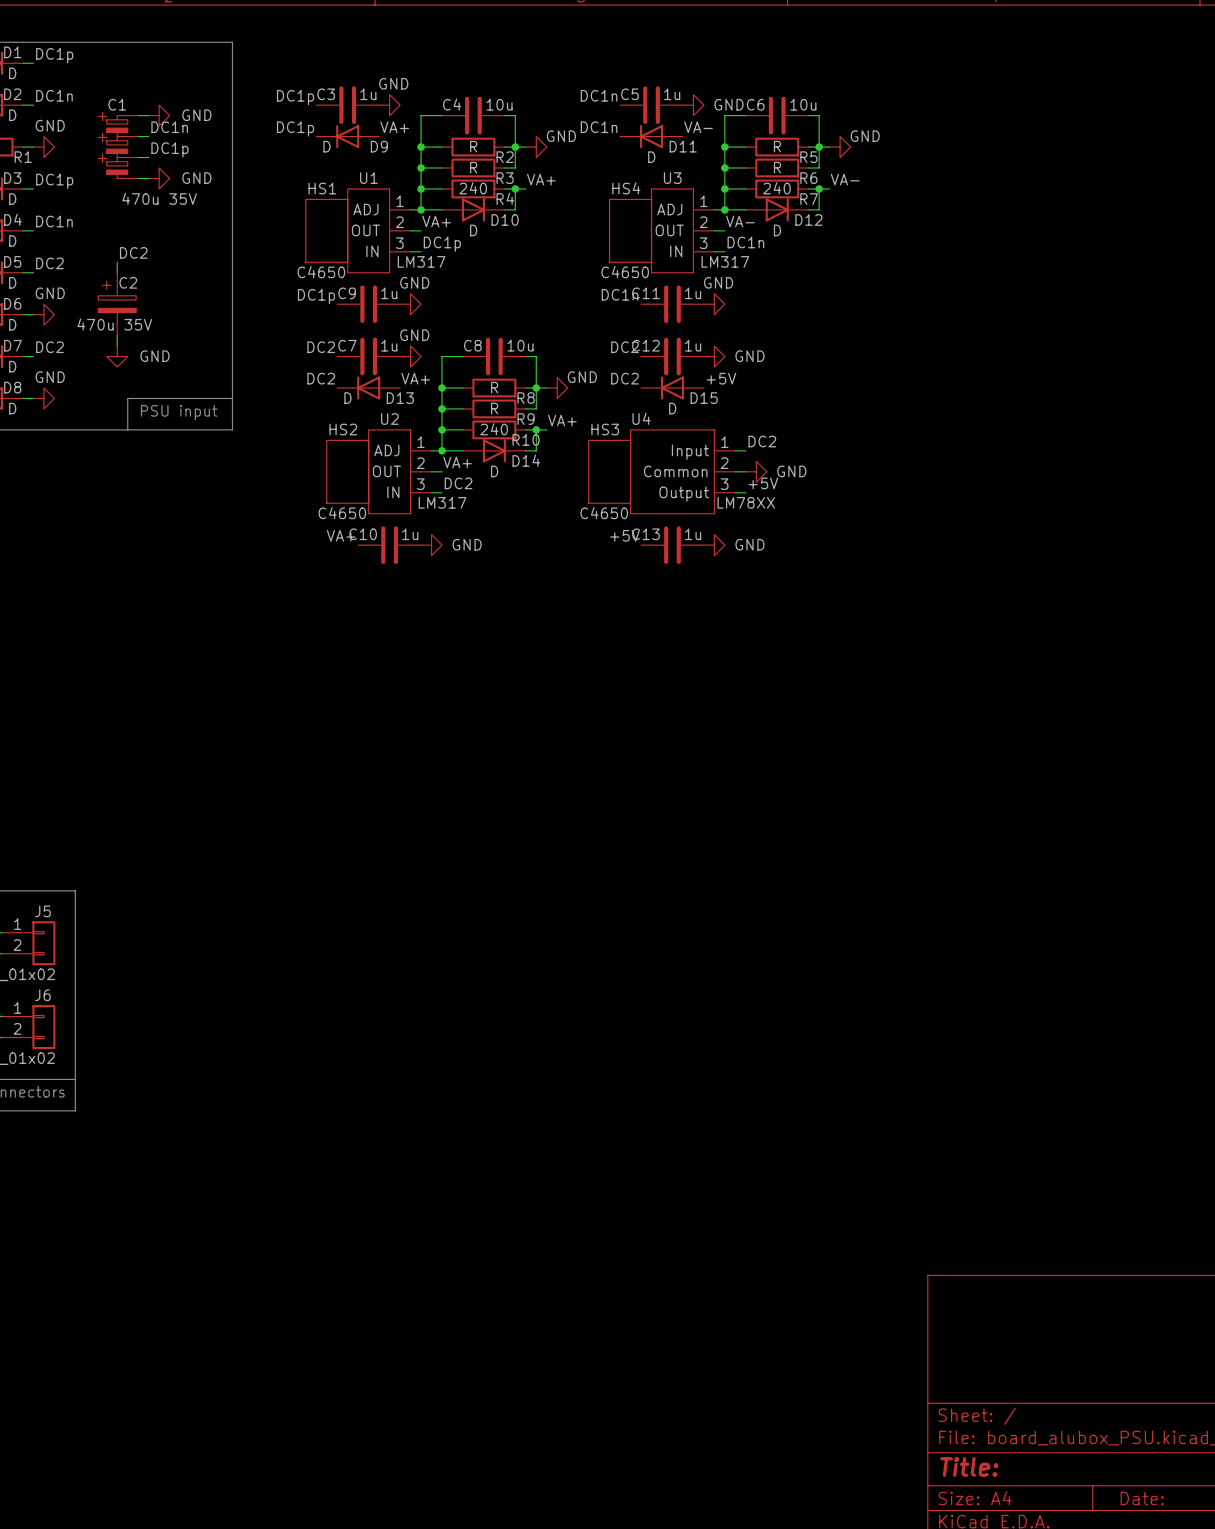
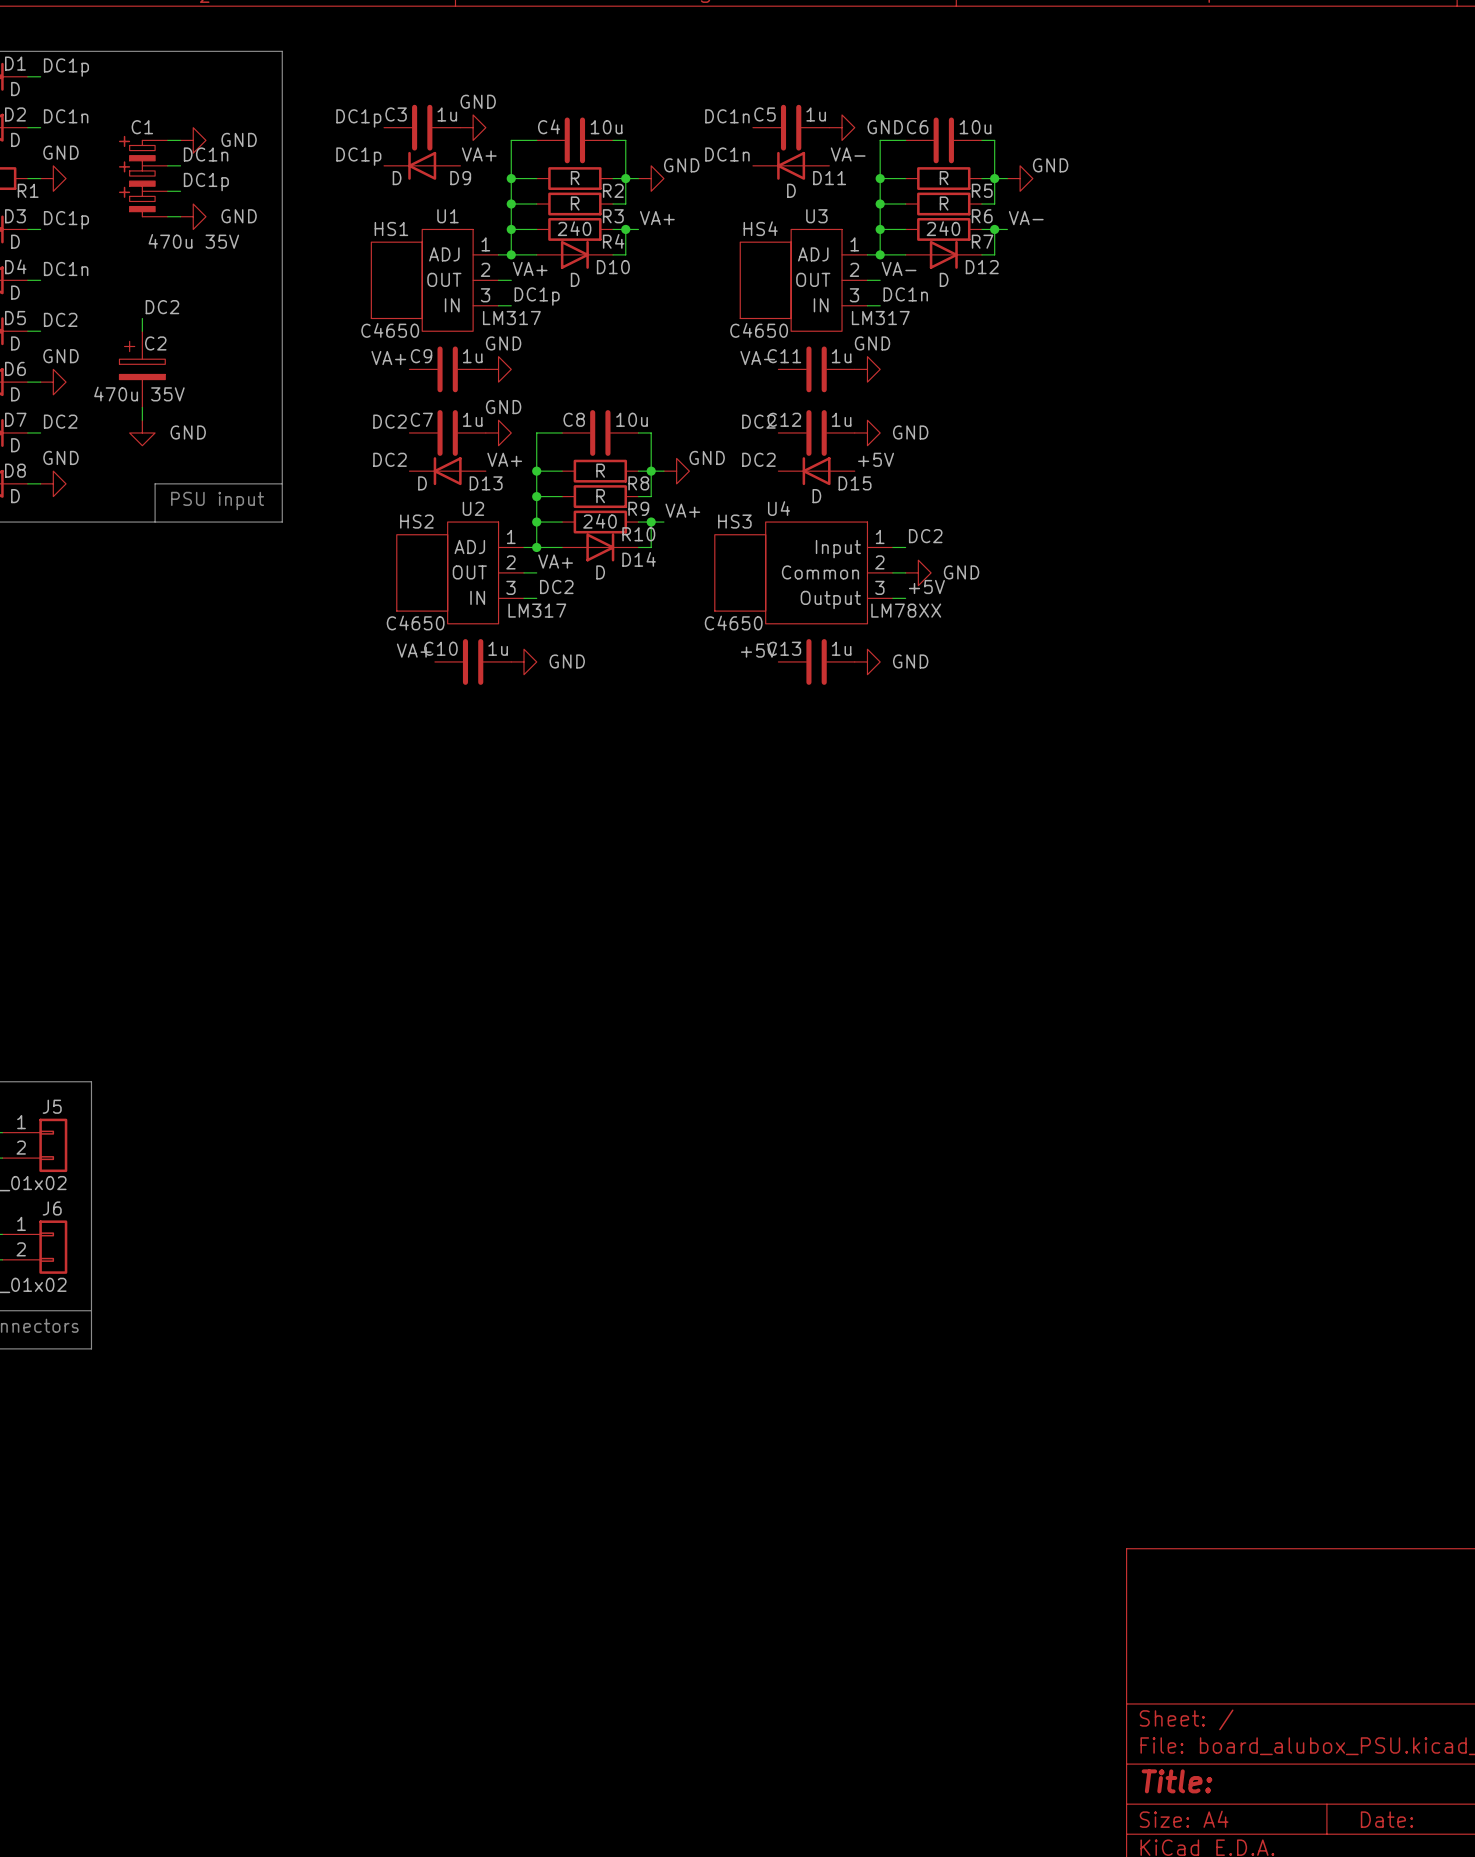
label: DC1n (620, 294) -> VA- (757, 358)
label: DC1p (316, 296) -> VA+ (388, 358)

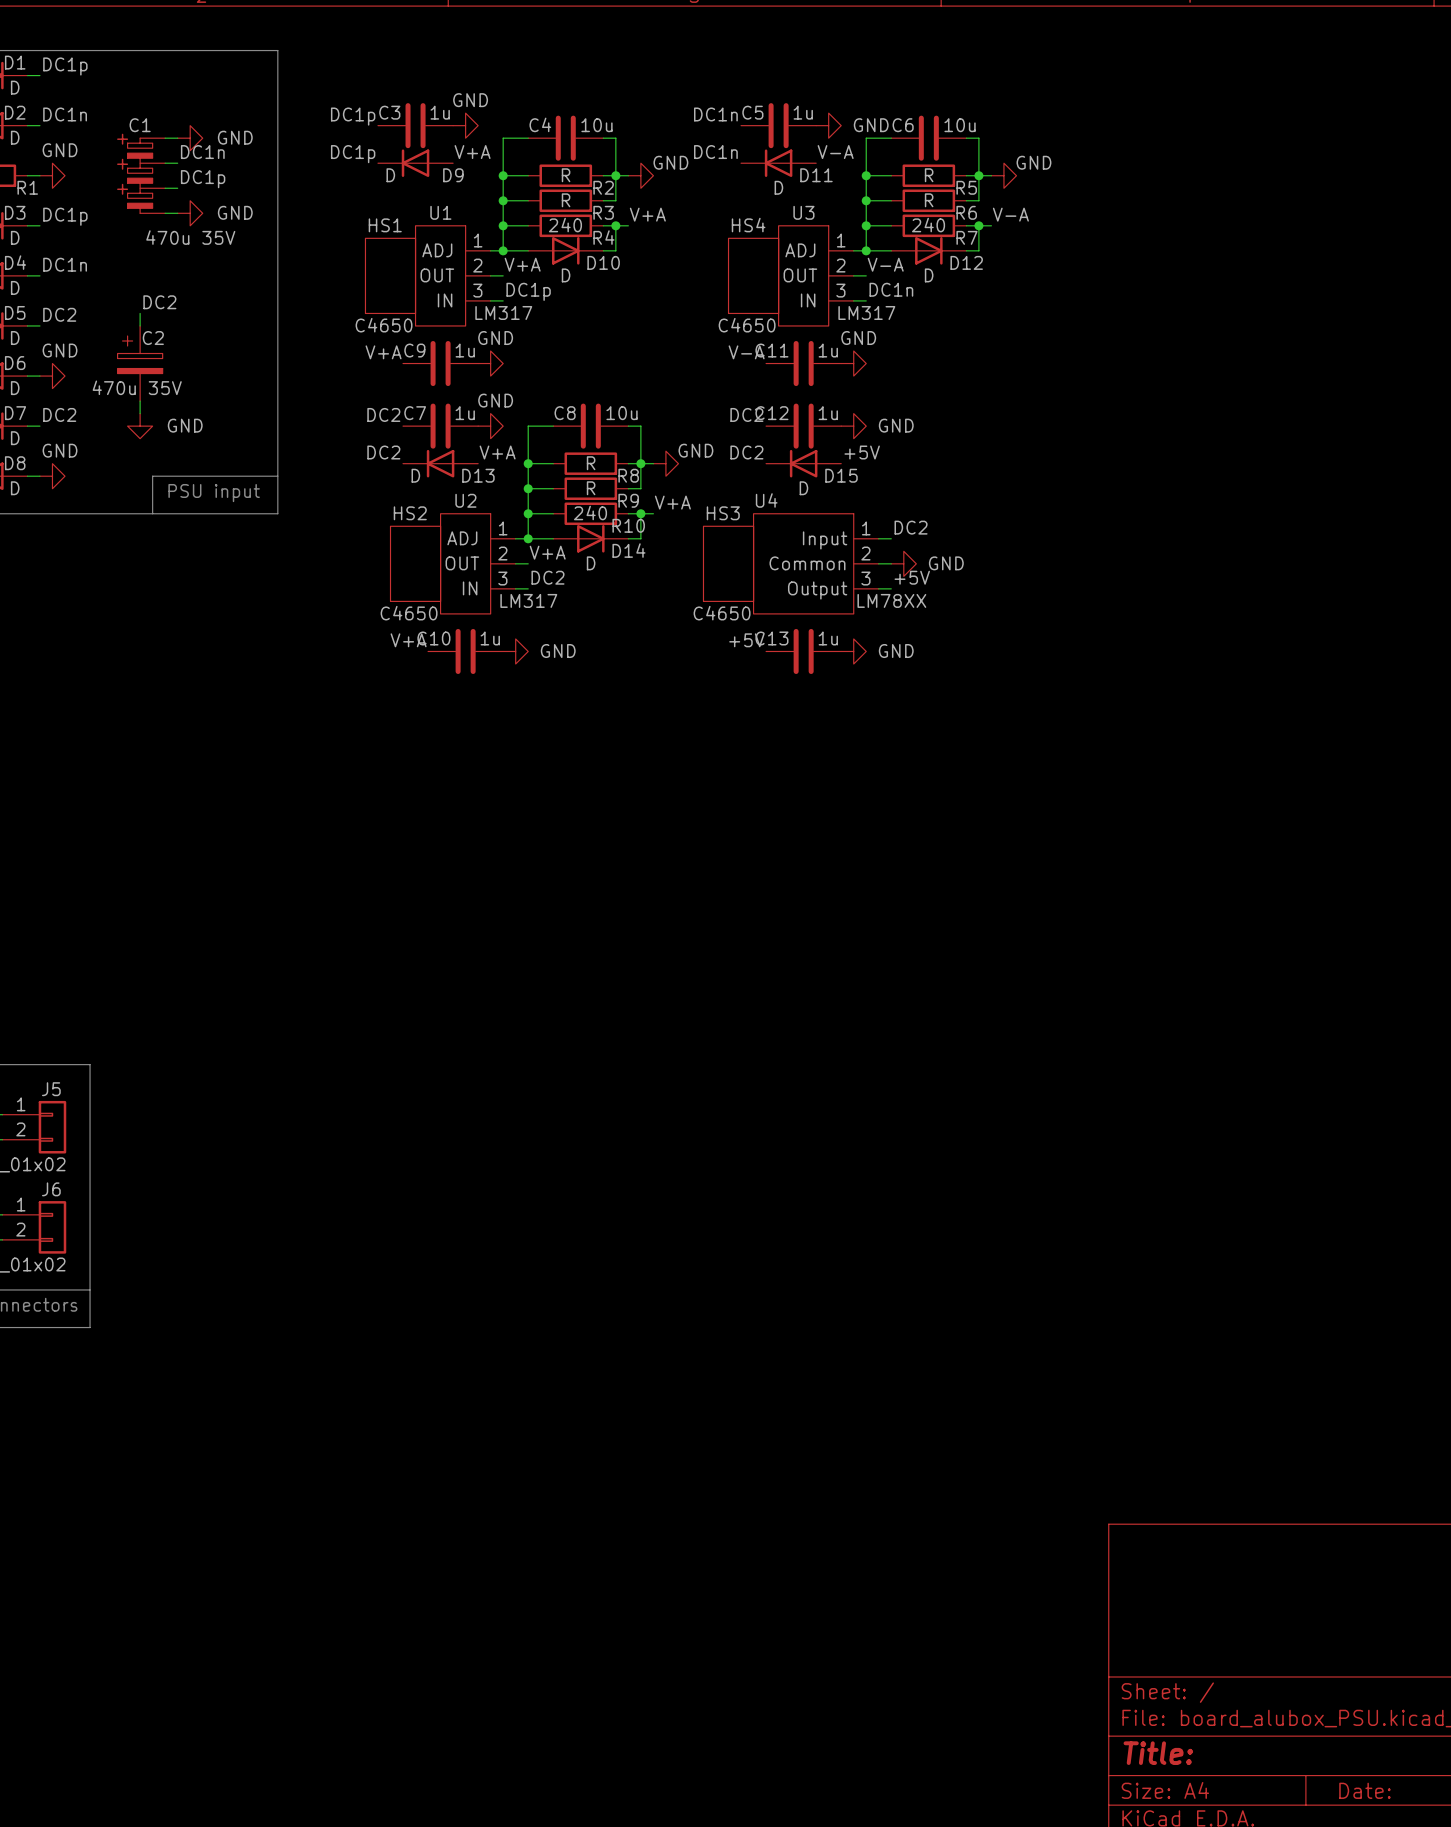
label: VA+ (479, 154) -> V+A (472, 152)
label: VA- (848, 154) -> V-A (835, 152)
label: VA+ (657, 218) -> V+A (647, 214)
label: VA- (1026, 218) -> V-A (1010, 214)
label: VA+ (530, 268) -> V+A (522, 264)
label: VA- (899, 268) -> V-A (885, 264)
label: VA+ (388, 358) -> V+A (383, 352)
label: VA- (757, 358) -> V-A (746, 352)
label: VA+ (504, 459) -> V+A (497, 452)
label: VA+ (682, 510) -> V+A (672, 502)
label: VA+ (555, 561) -> V+A (547, 552)
label: VA+ (414, 650) -> V+A (408, 640)

